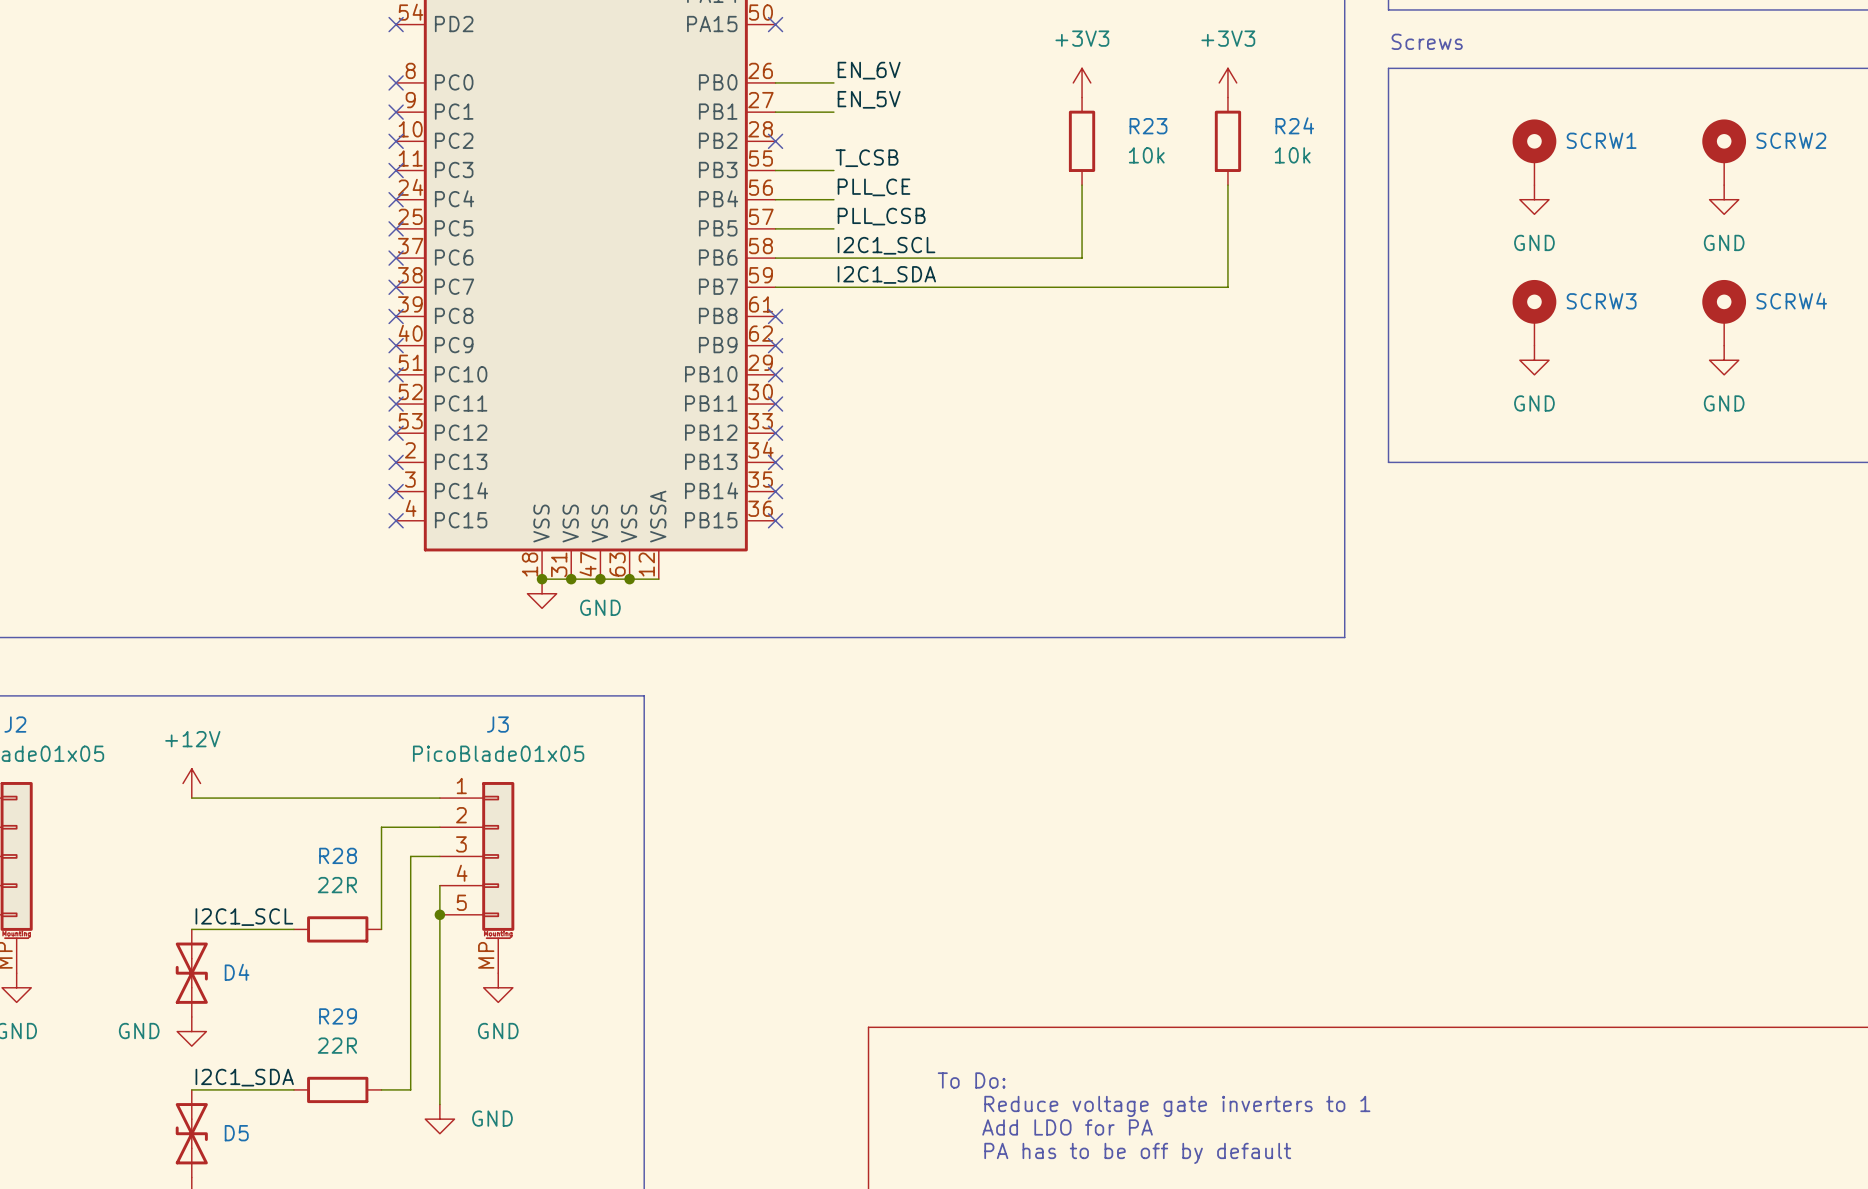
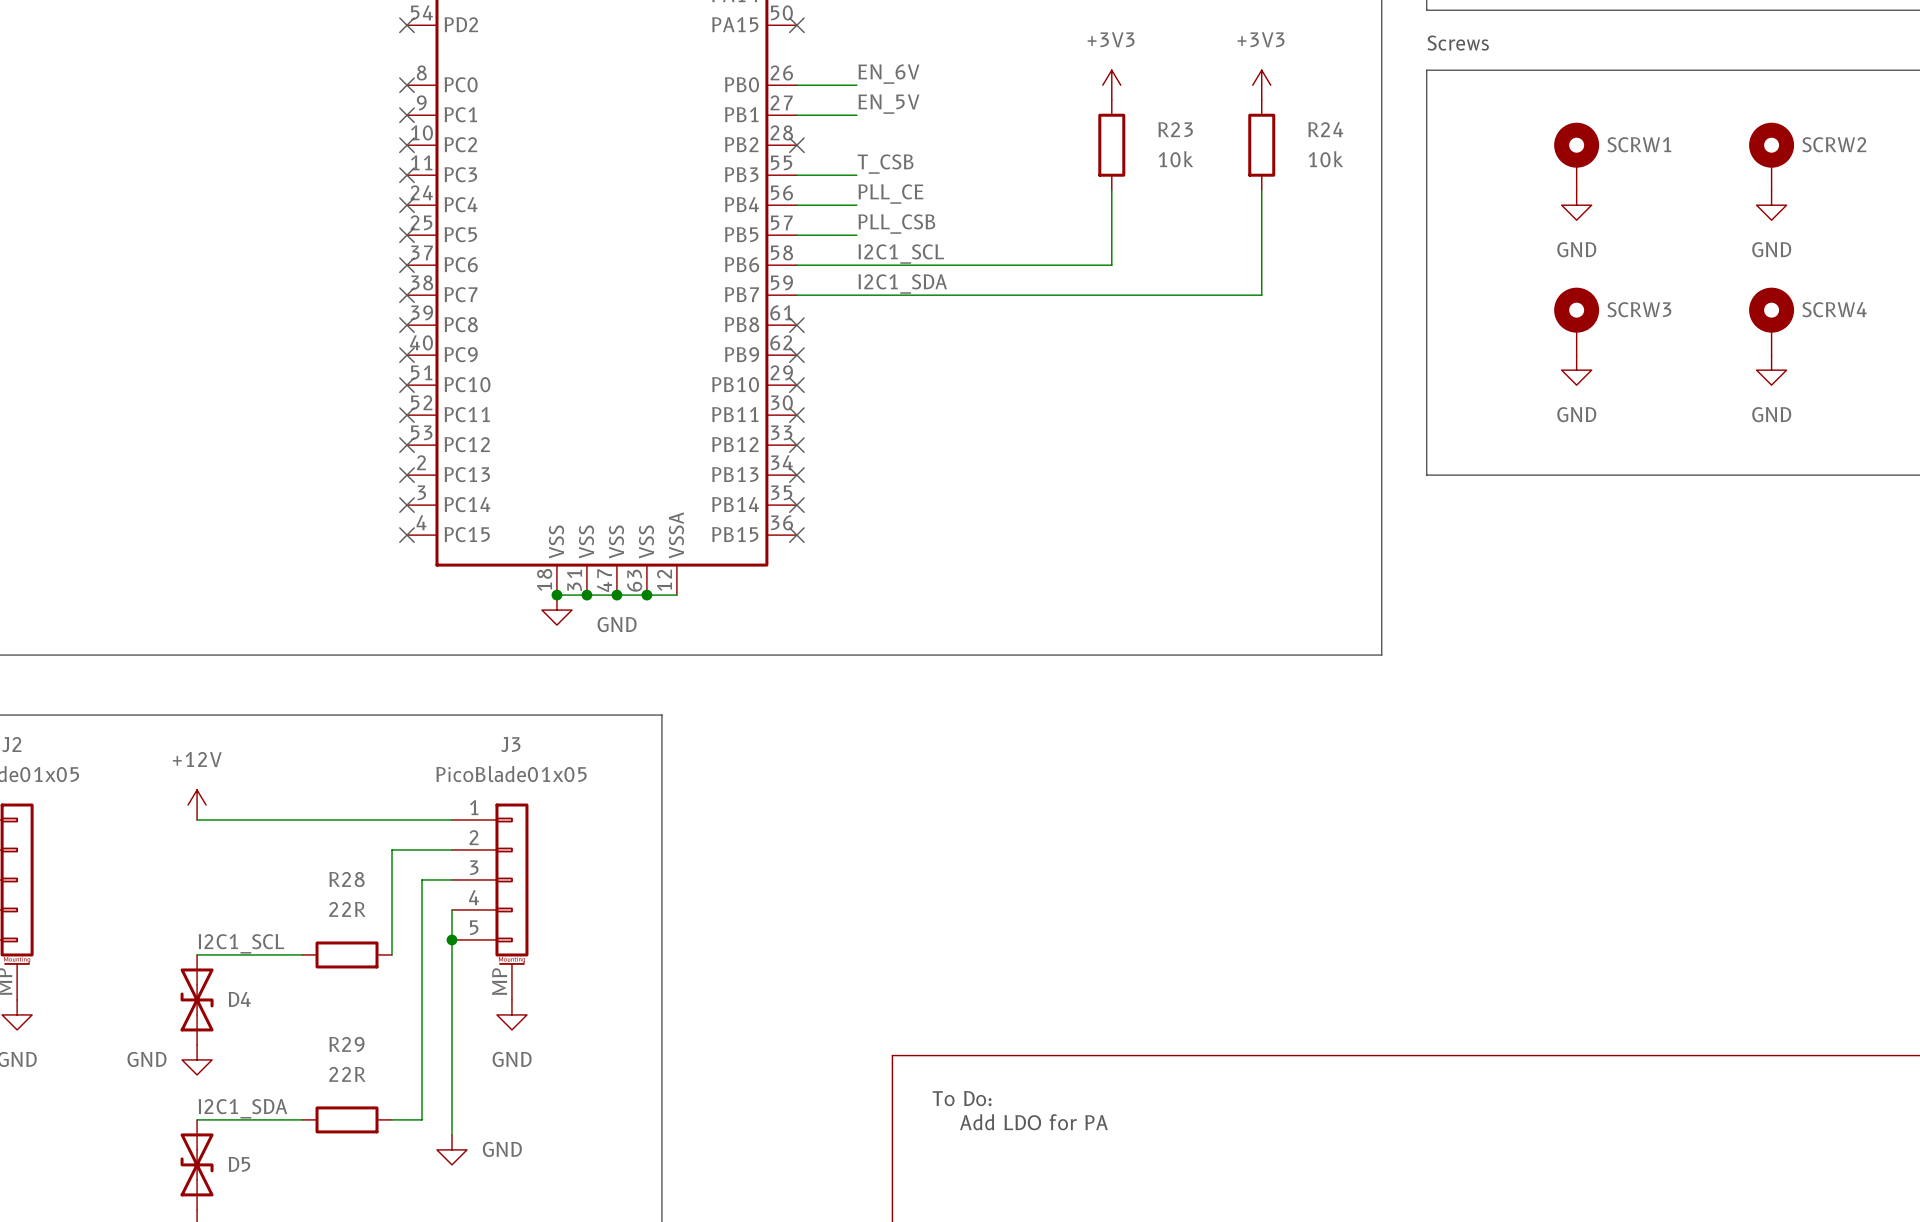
text position: To Do: (971, 1080) -> To Do: (962, 1098)
text: Reduce voltage gate inverters to 1 (1177, 1106) -> none
text position: Add LDO for PA (1067, 1127) -> Add LDO for PA (1033, 1122)
text: PA has to be off by default (1137, 1153) -> none

